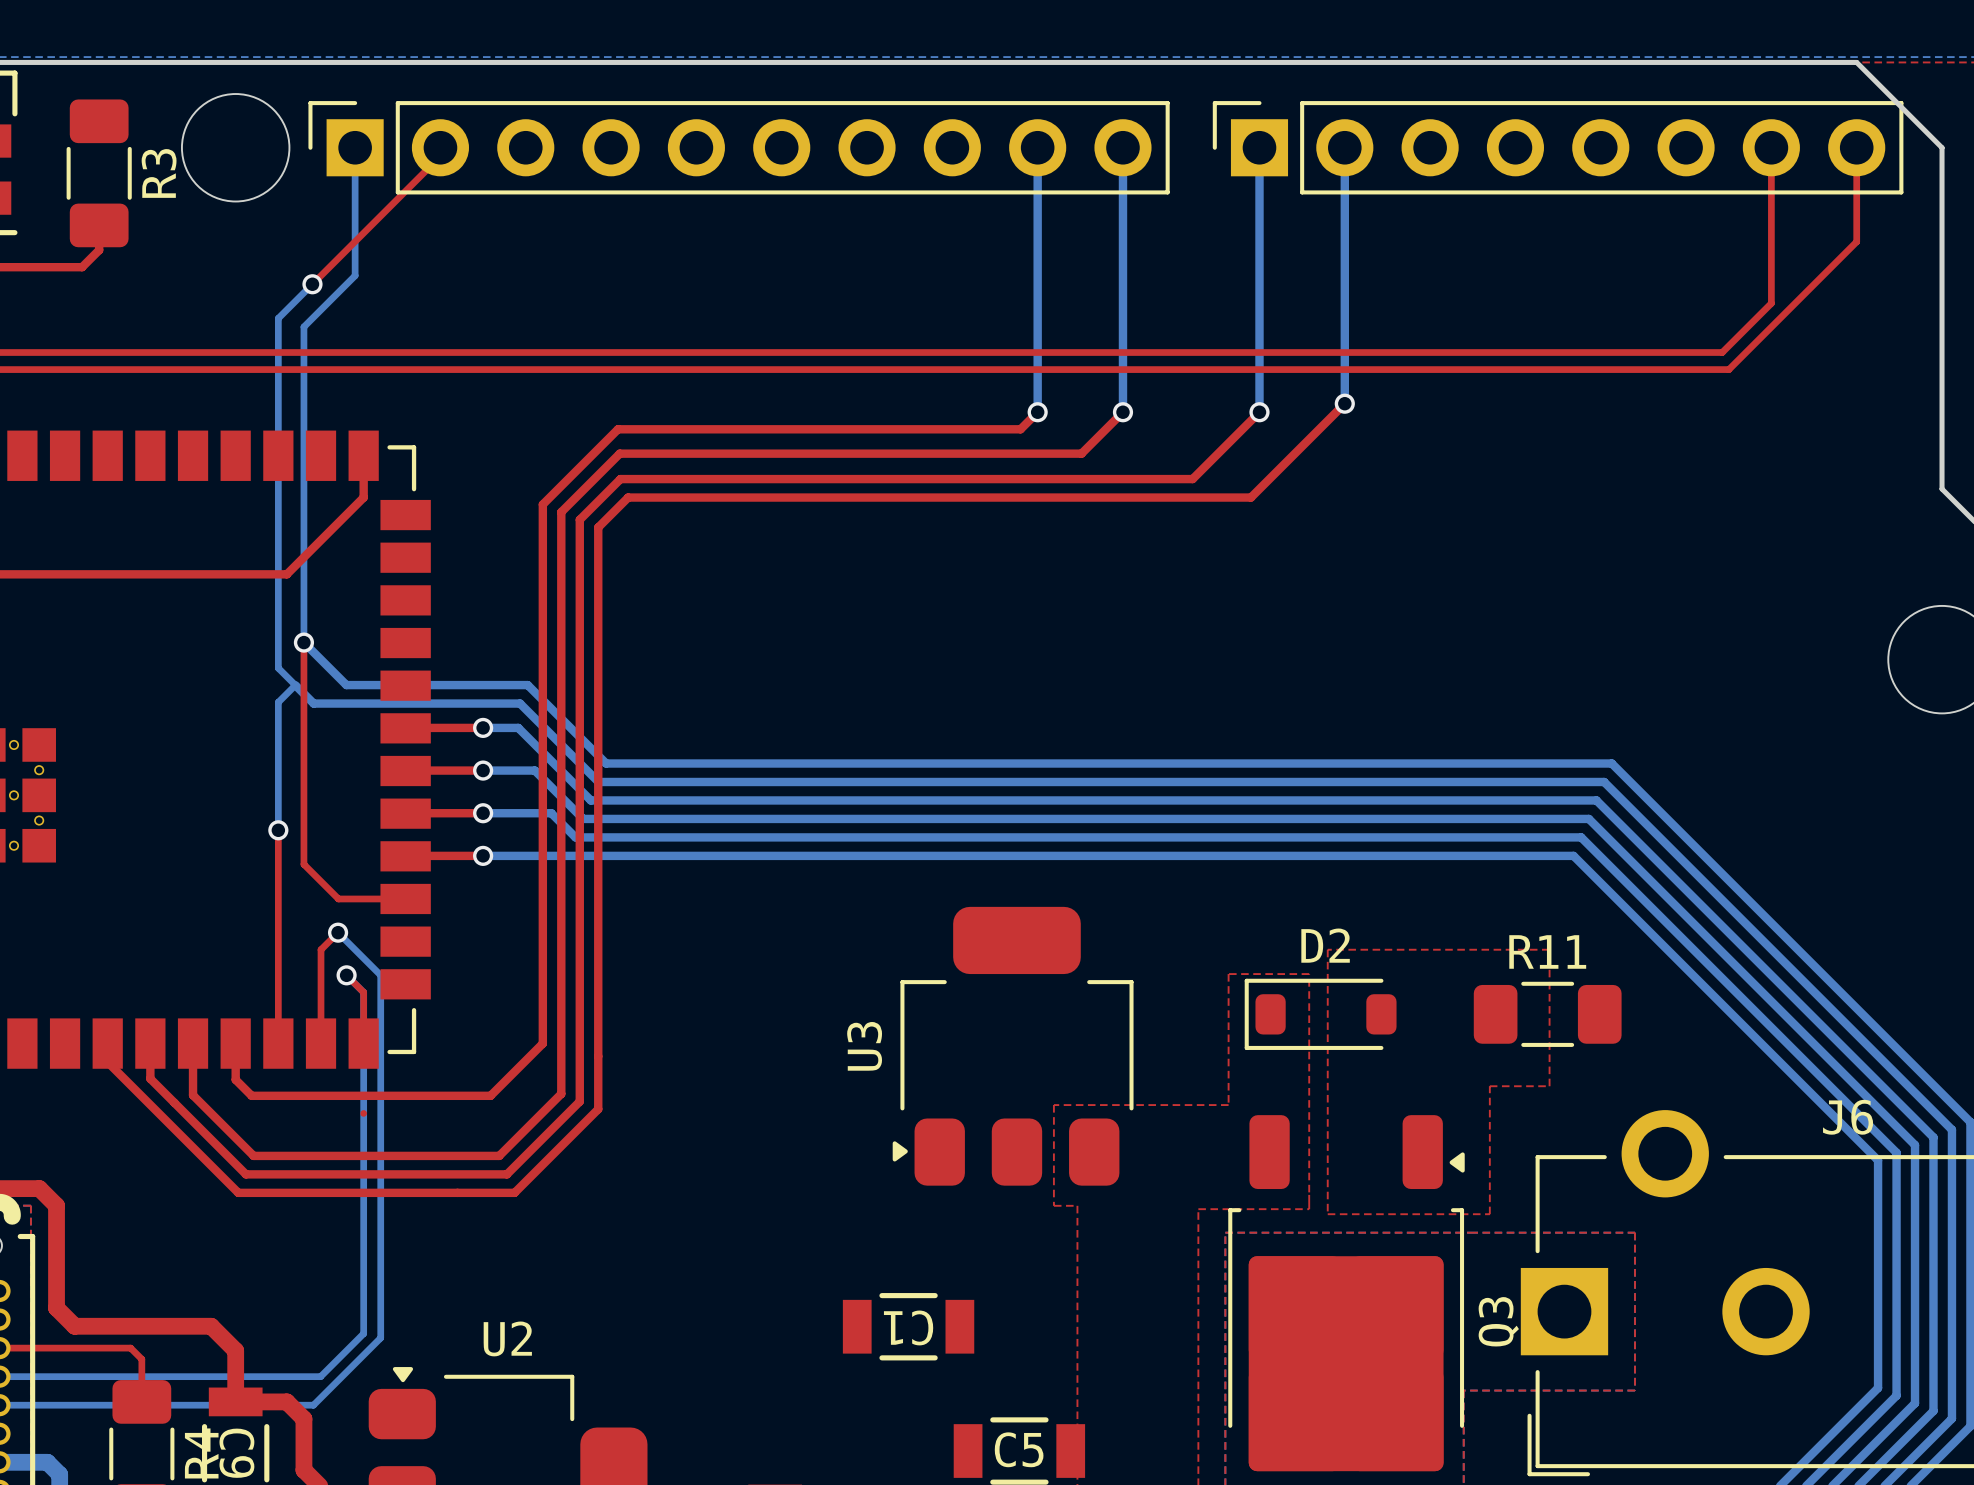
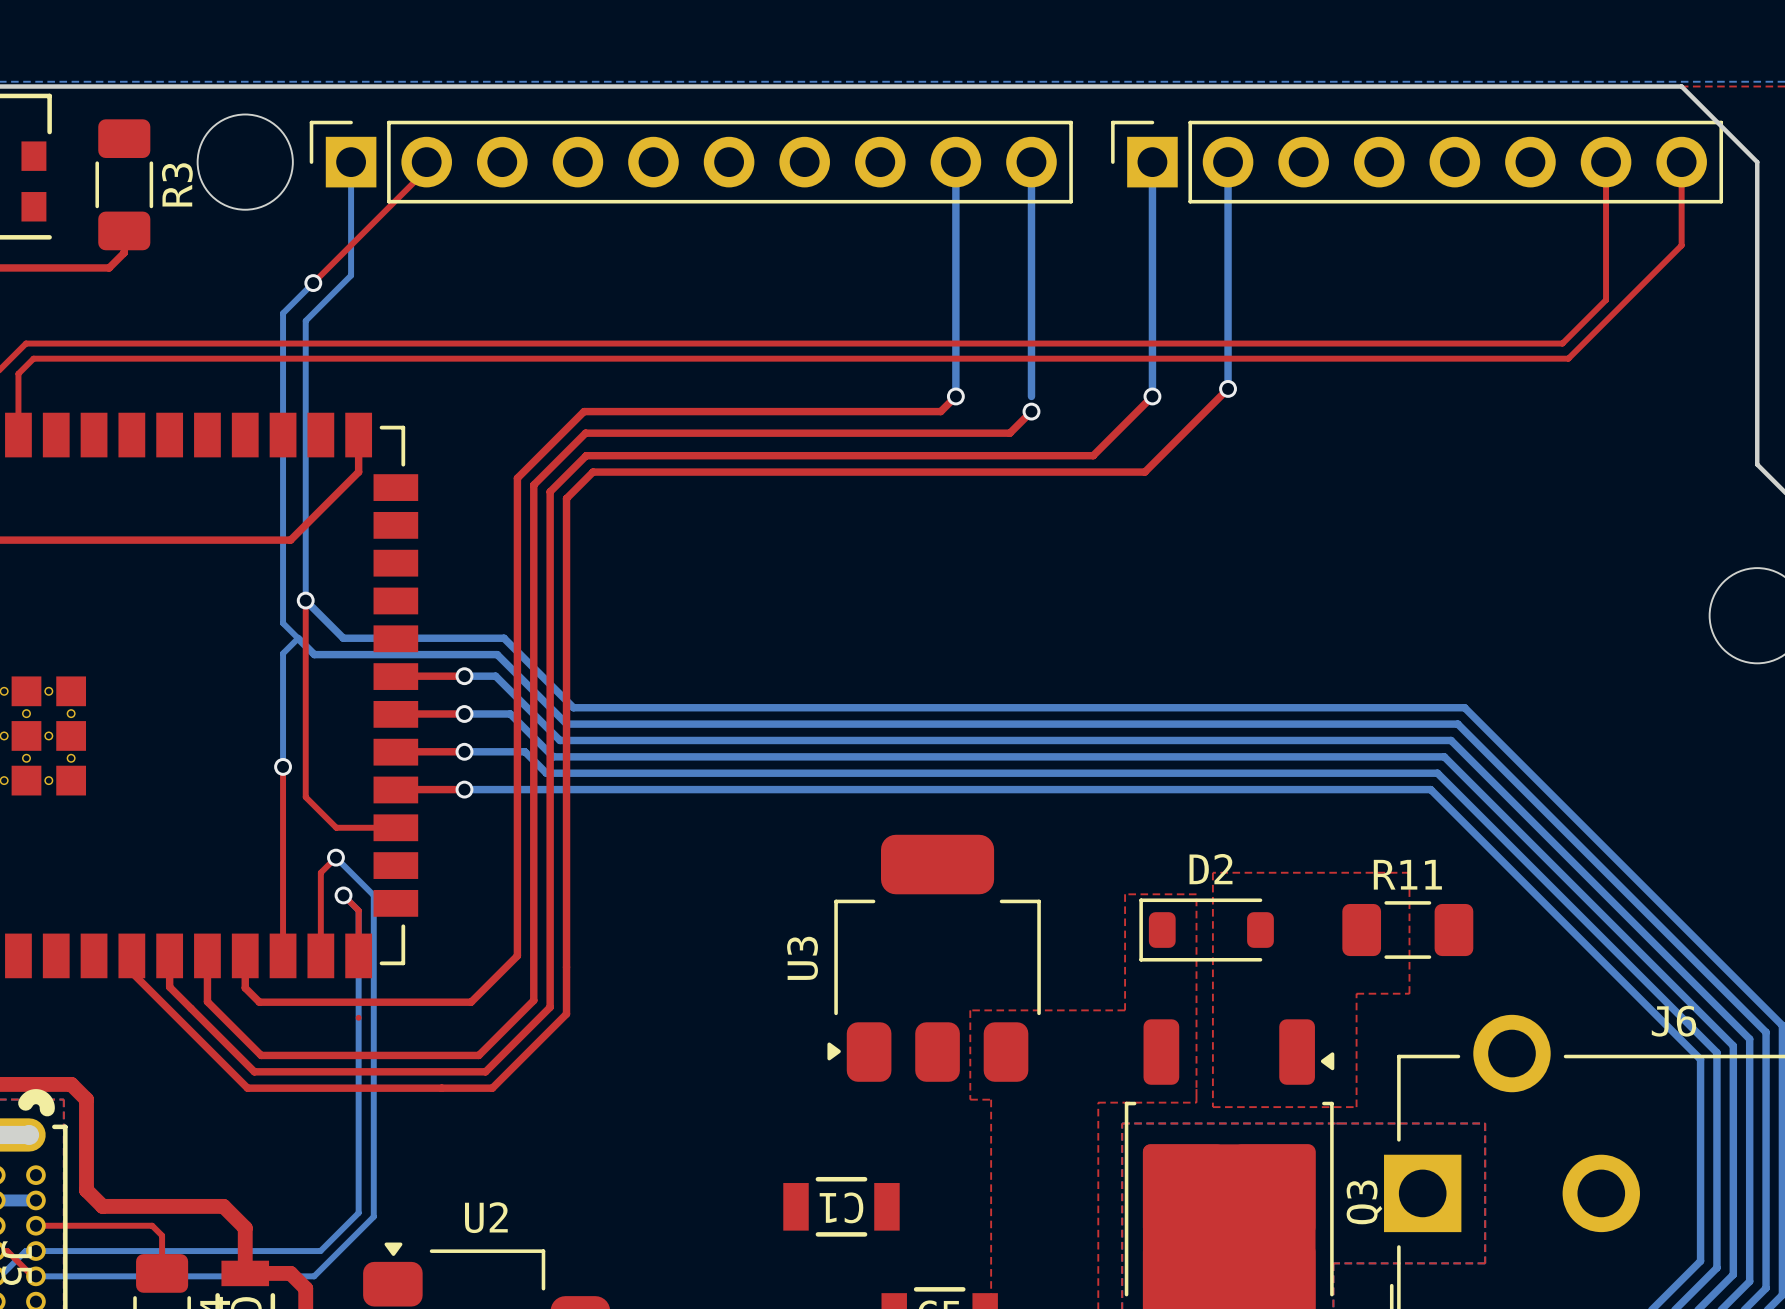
top track: (1122, 412) (1081, 453) -> (1031, 411) (1009, 433) (994, 433)
via position: (1122, 412) -> (1031, 411)

